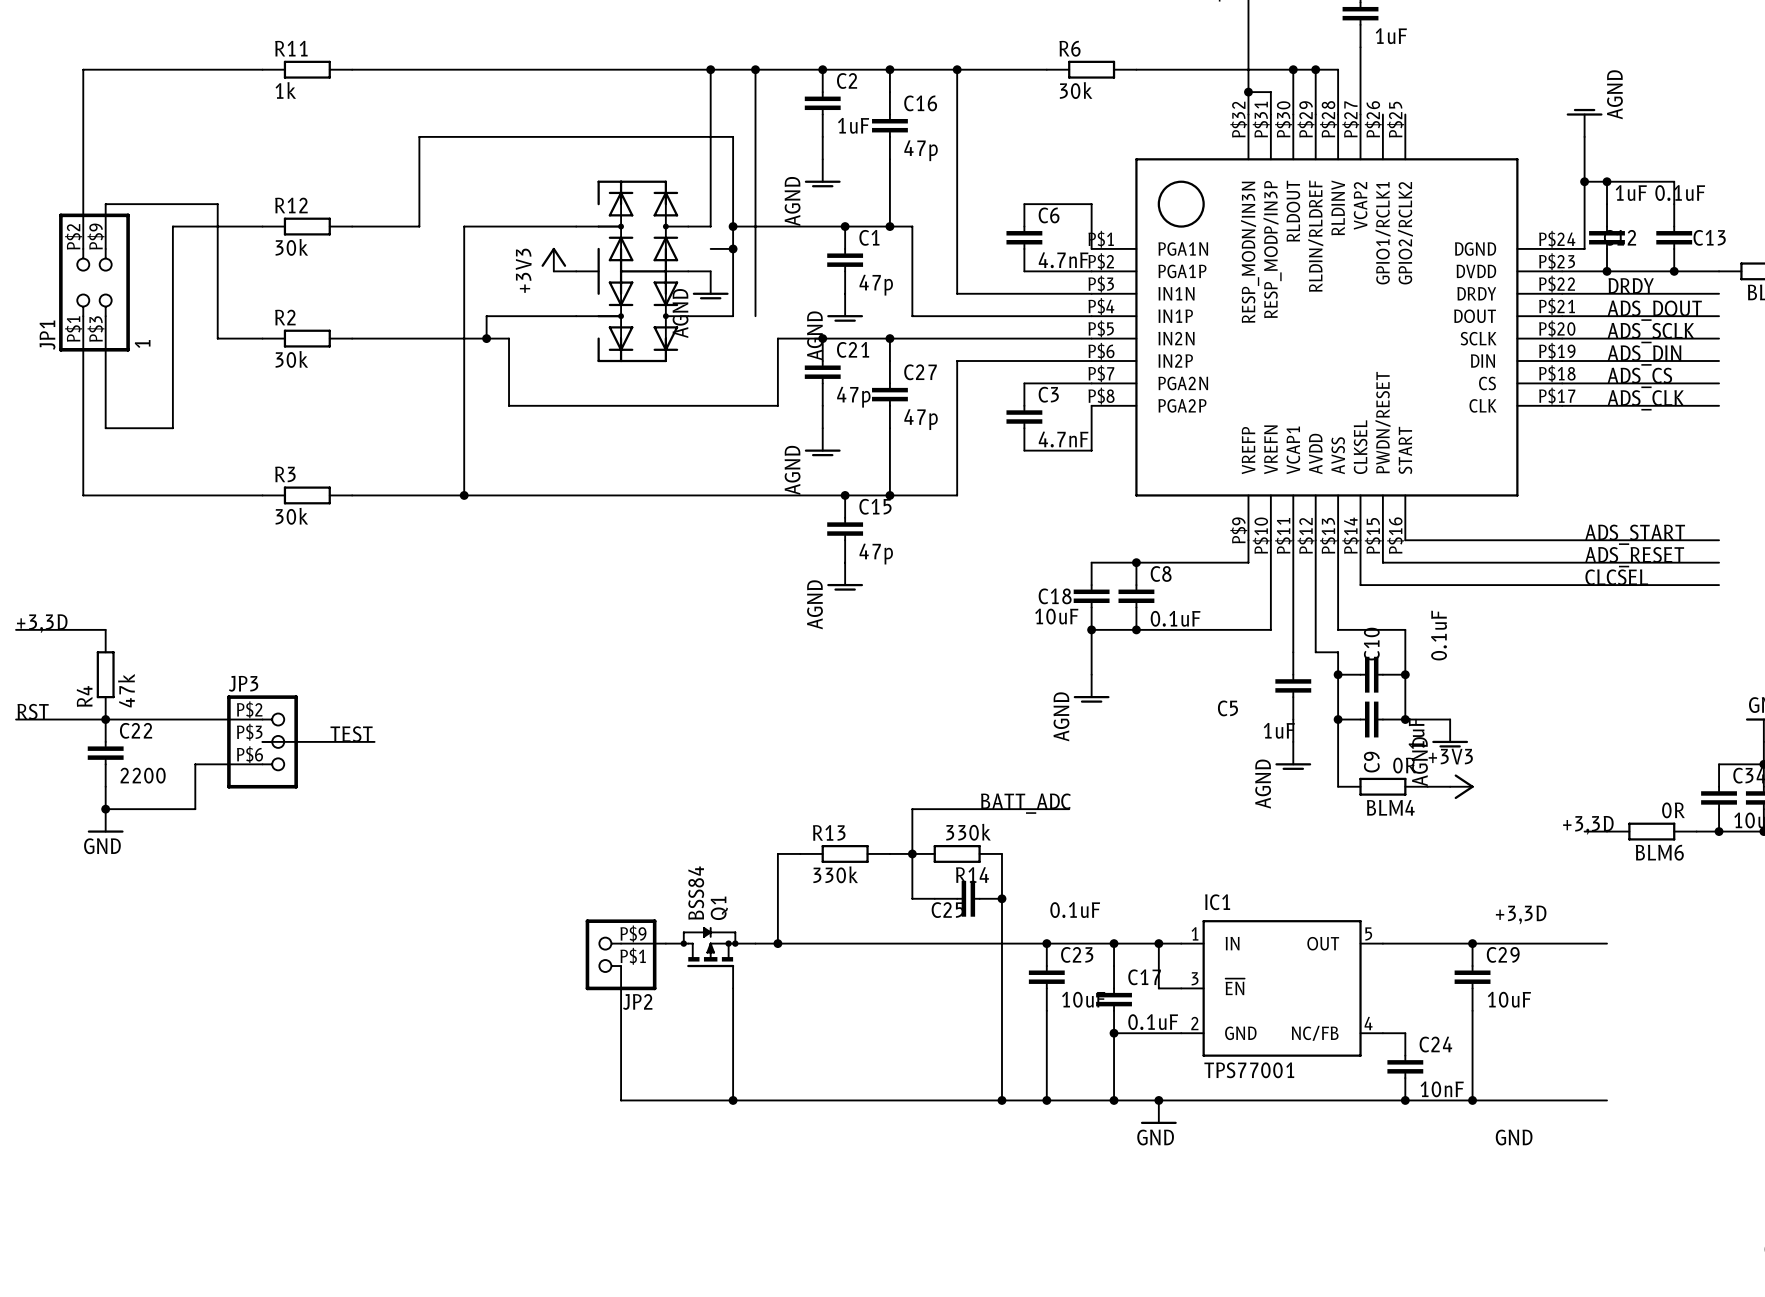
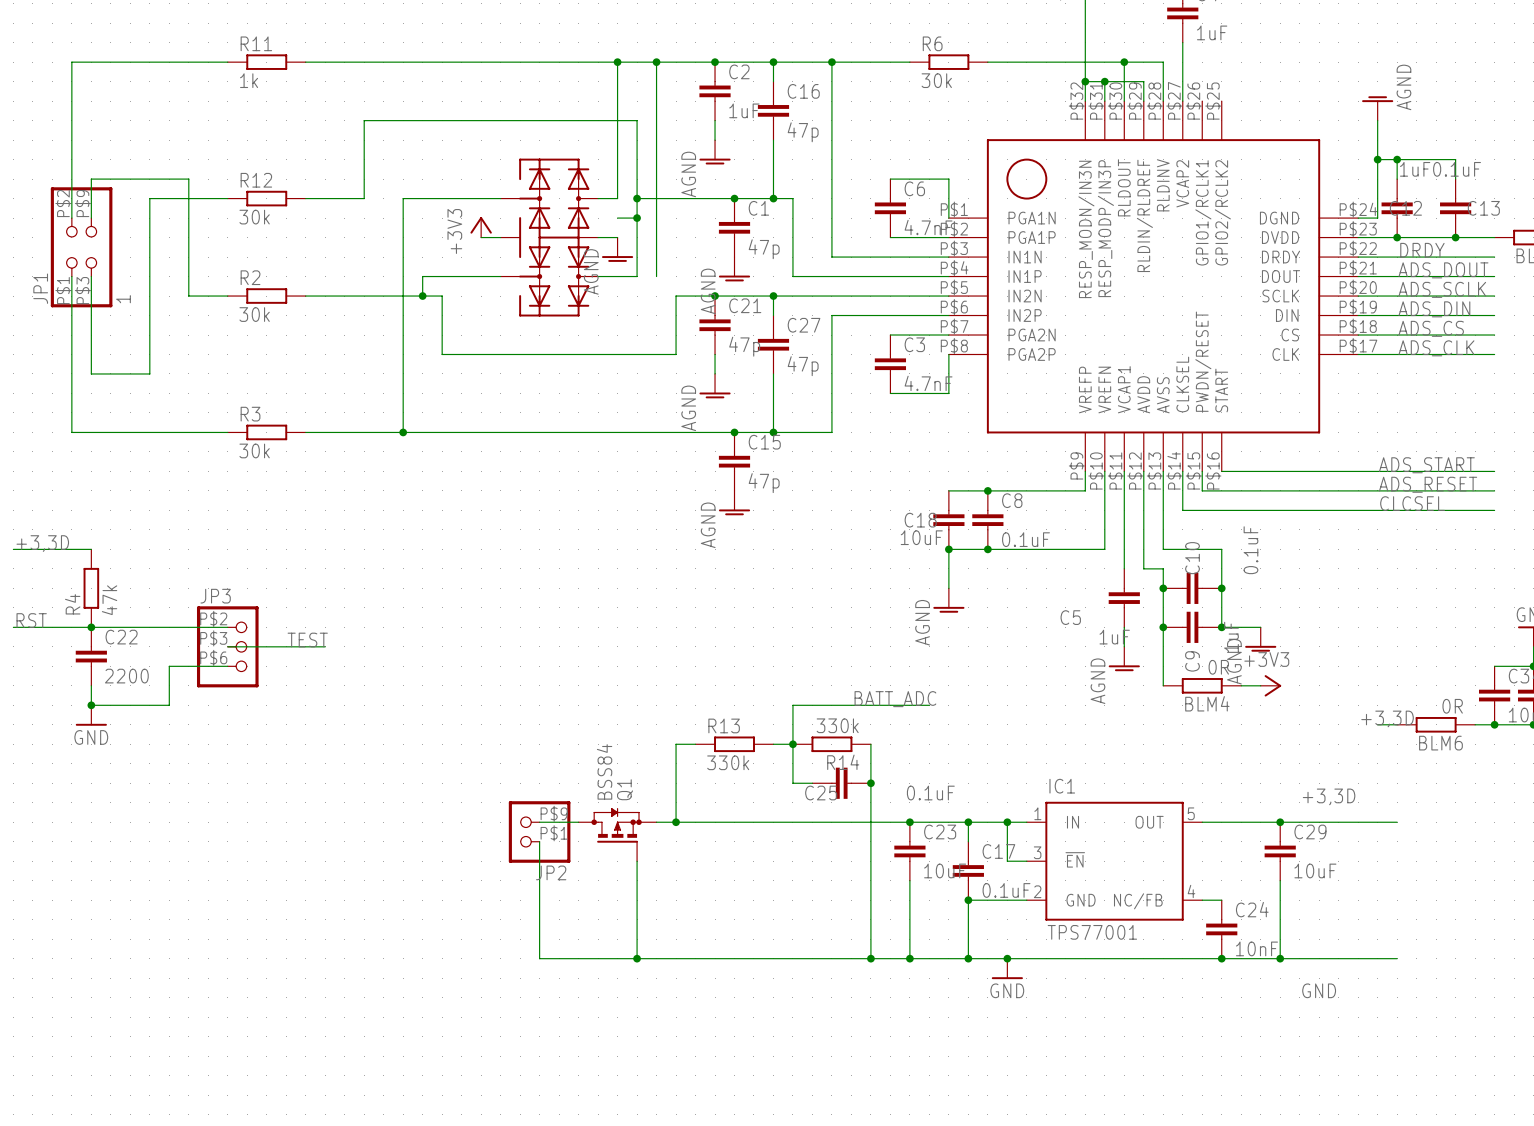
wire: (1315, 69) (1315, 92) -> (1104, 81) (1143, 81)
junction position: (1315, 69) -> (1104, 81)

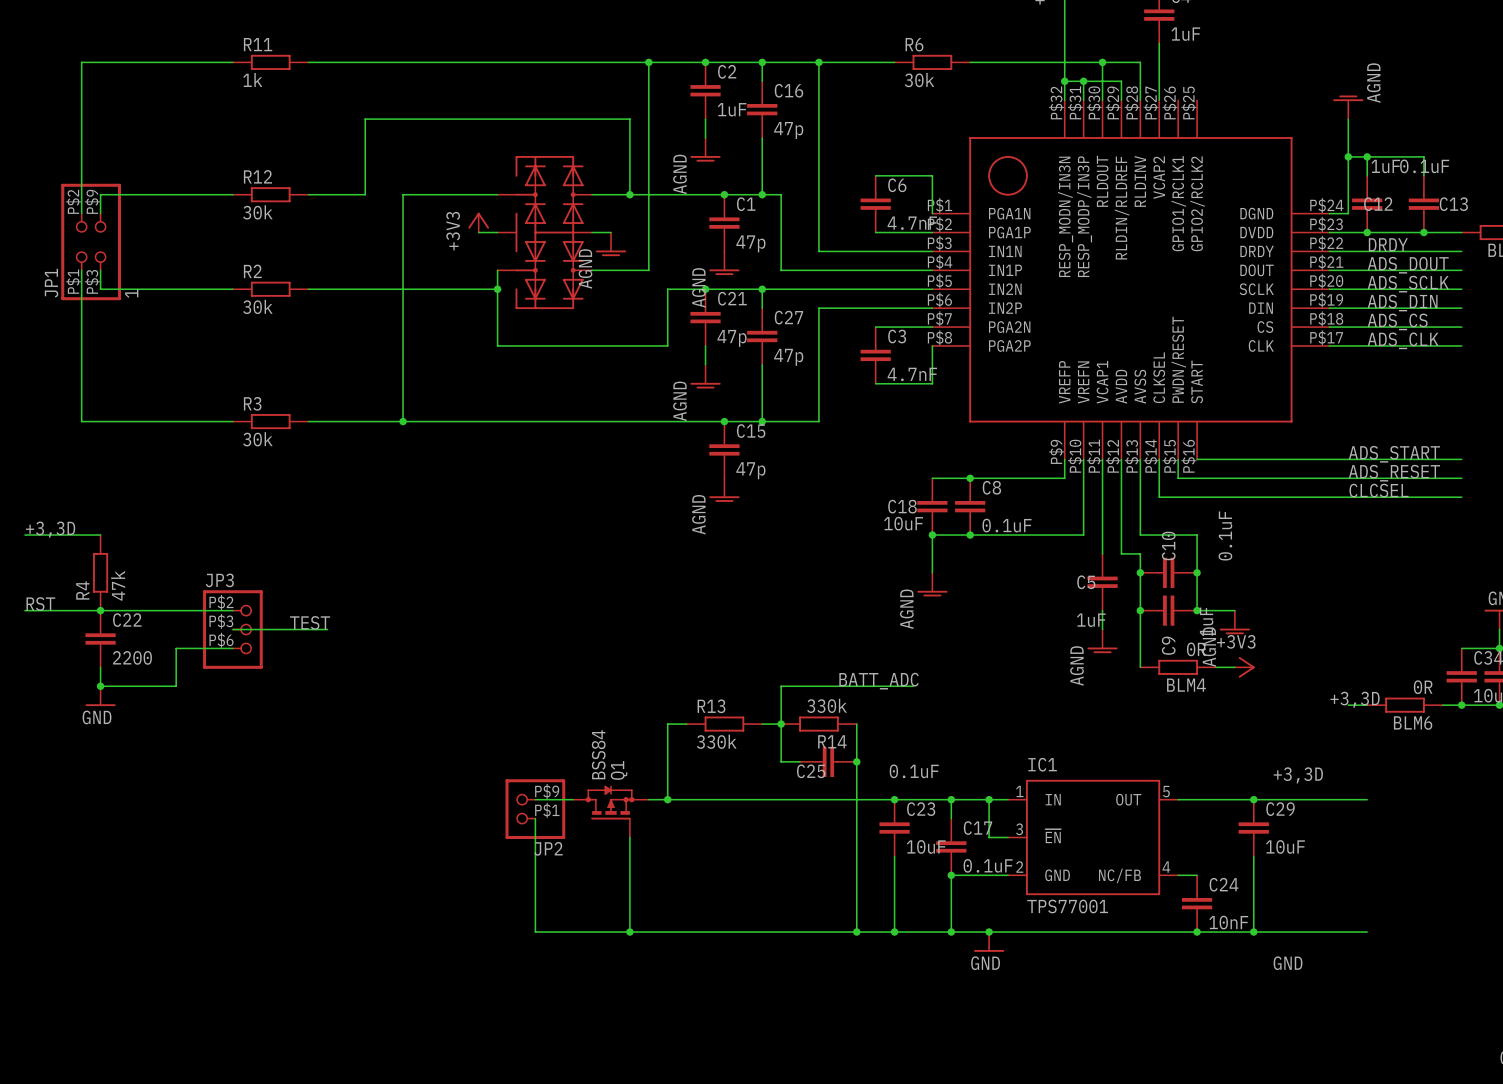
wire: (617, 62) (617, 198) -> none
junction: (617, 62) -> none
wire: (91, 198) (91, 179) (188, 179) (188, 296) -> (100, 289) (195, 289)
wire: (149, 198) (149, 373) (91, 373) (91, 296) -> (157, 194) (100, 194)
wire: (637, 198) (637, 276) -> (629, 194) (611, 194)
wire: (617, 218) (637, 218) -> (629, 270) (648, 270)
junction: (637, 218) -> none
wire: (500, 276) (422, 276) (422, 296) -> (497, 270) (497, 345)
junction: (422, 296) -> none
wire: (442, 296) (442, 354) (500, 354) -> (440, 289) (497, 289)
junction: none -> (497, 289)
C5 name position: C5 (1070, 617) -> C5 (1086, 582)

